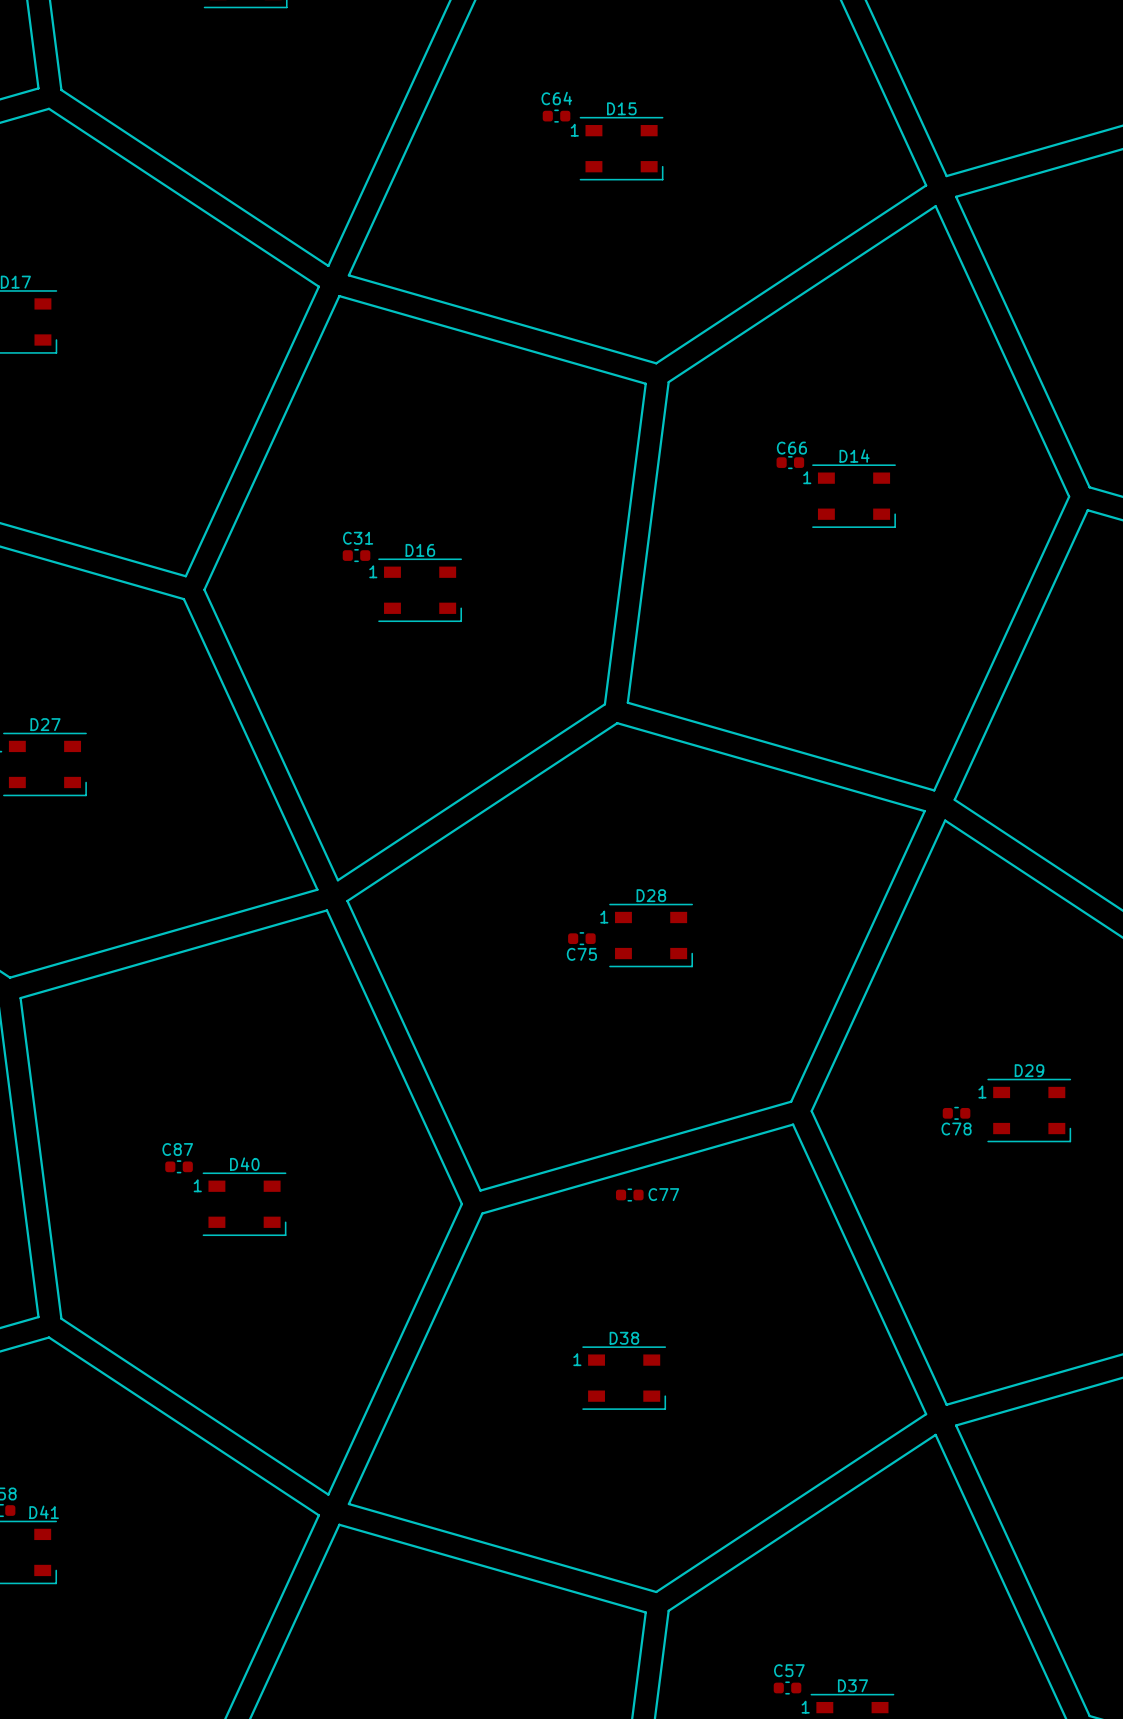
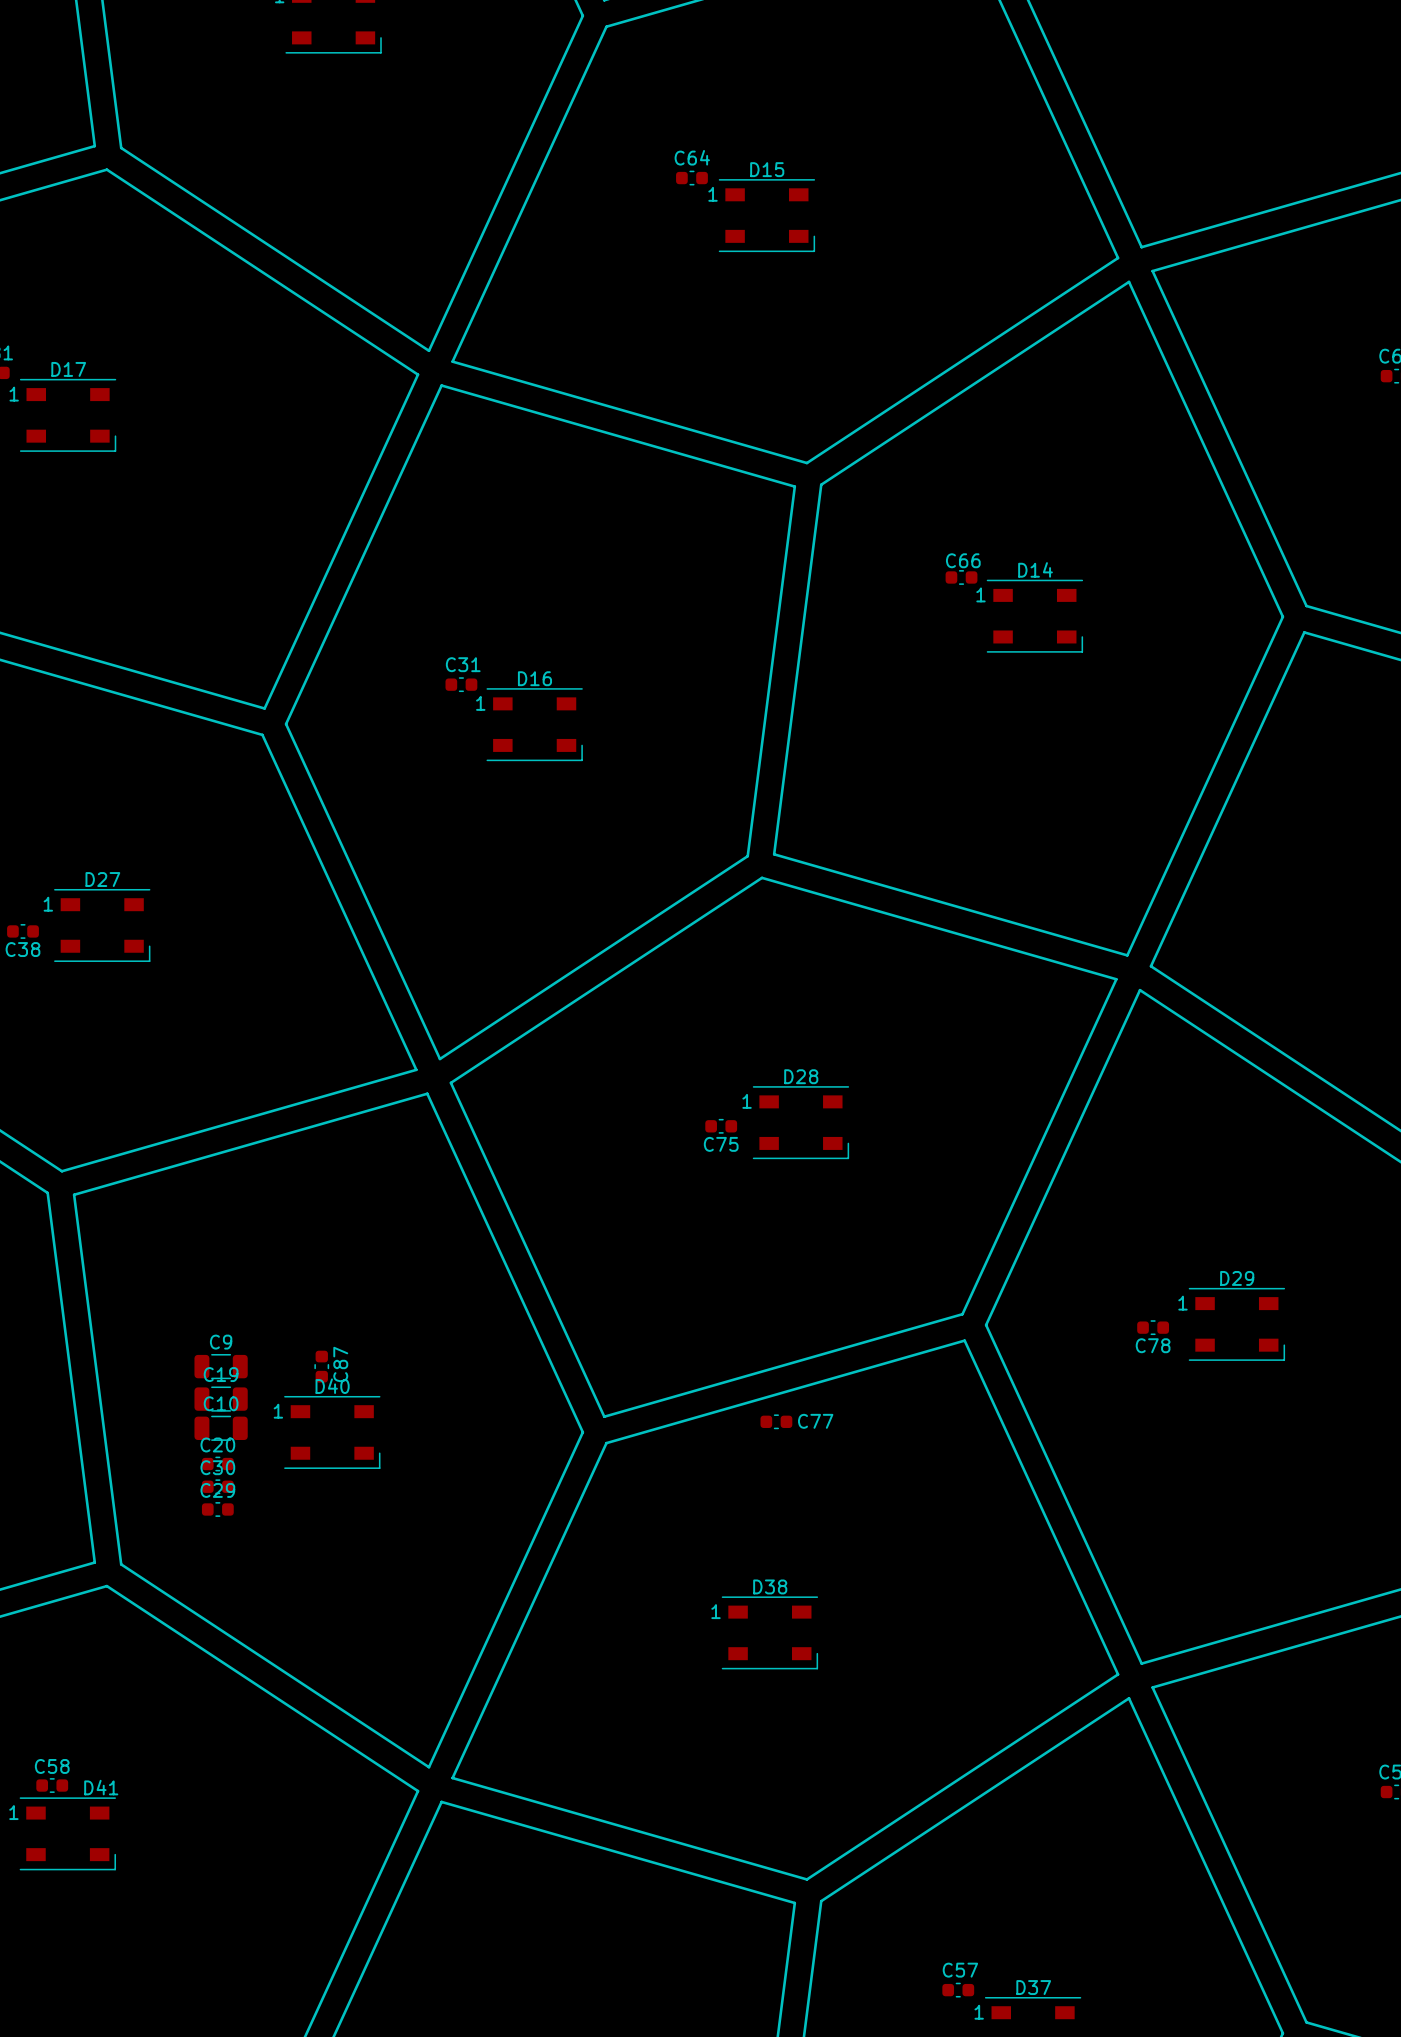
C9: none -> (221, 1366)
C87 rotation: 0° (179, 1166) -> 90° clockwise (321, 1366)
C87 position: (179, 1166) -> (321, 1366)
C19: none -> (221, 1399)
C10: none -> (221, 1428)
C20: none -> (217, 1464)
C30: none -> (217, 1486)
C29: none -> (217, 1509)

